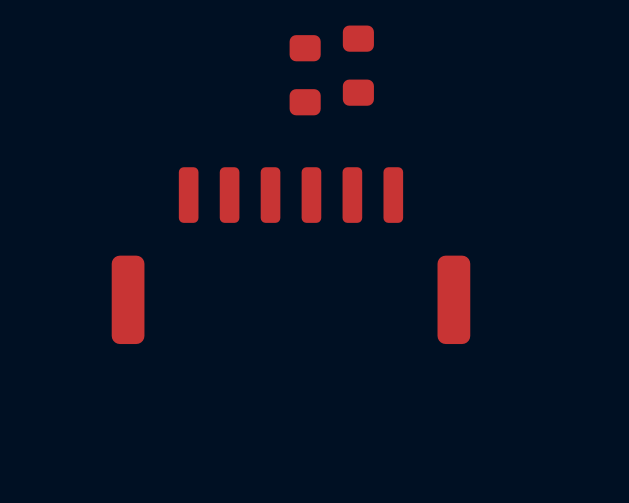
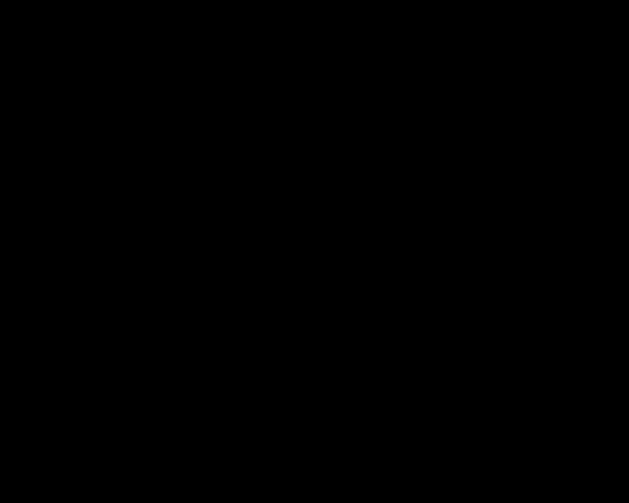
part: (358, 65) -> none
part: (305, 75) -> none
part: (290, 255) -> none

